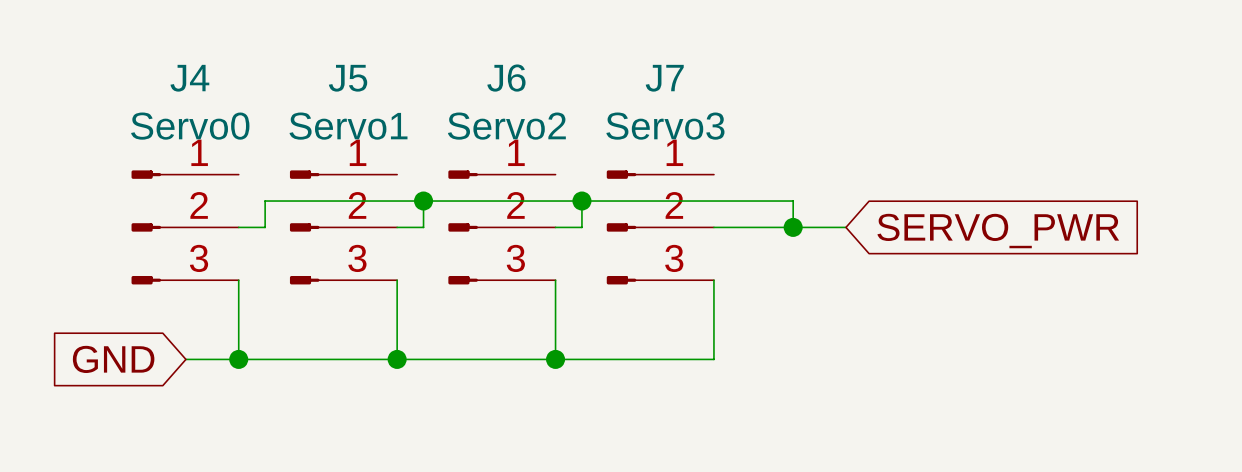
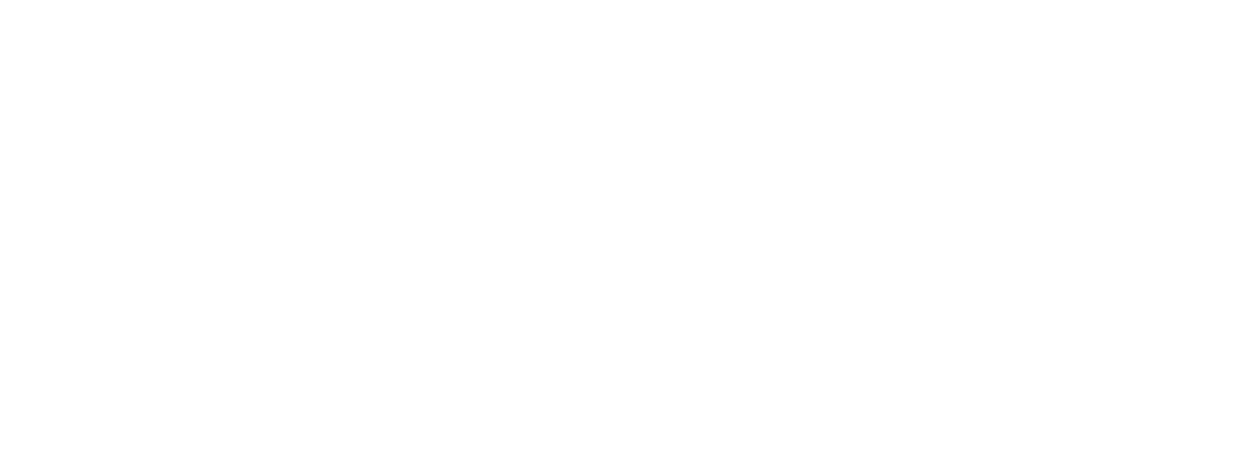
wire: (423, 201) (423, 227) (397, 227) -> none
junction: (423, 201) -> none
wire: (581, 201) (581, 227) (555, 227) -> none
junction: (581, 201) -> none
J4: Servo0 (185, 227) -> none
wire: (238, 227) (265, 227) (265, 201) (793, 201) (793, 227) -> none
J5: Servo1 (343, 227) -> none
J6: Servo2 (501, 227) -> none
J7: Servo3 (660, 227) -> none
wire: (713, 227) (845, 227) -> none
junction: (793, 227) -> none
global label: SERVO_PWR (998, 231) -> none
wire: (238, 280) (238, 359) -> none
wire: (397, 280) (397, 359) -> none
wire: (555, 280) (555, 359) -> none
wire: (713, 280) (713, 359) (185, 359) -> none
global label: GND (113, 359) -> none
junction: (238, 359) -> none
junction: (397, 359) -> none
junction: (555, 359) -> none

